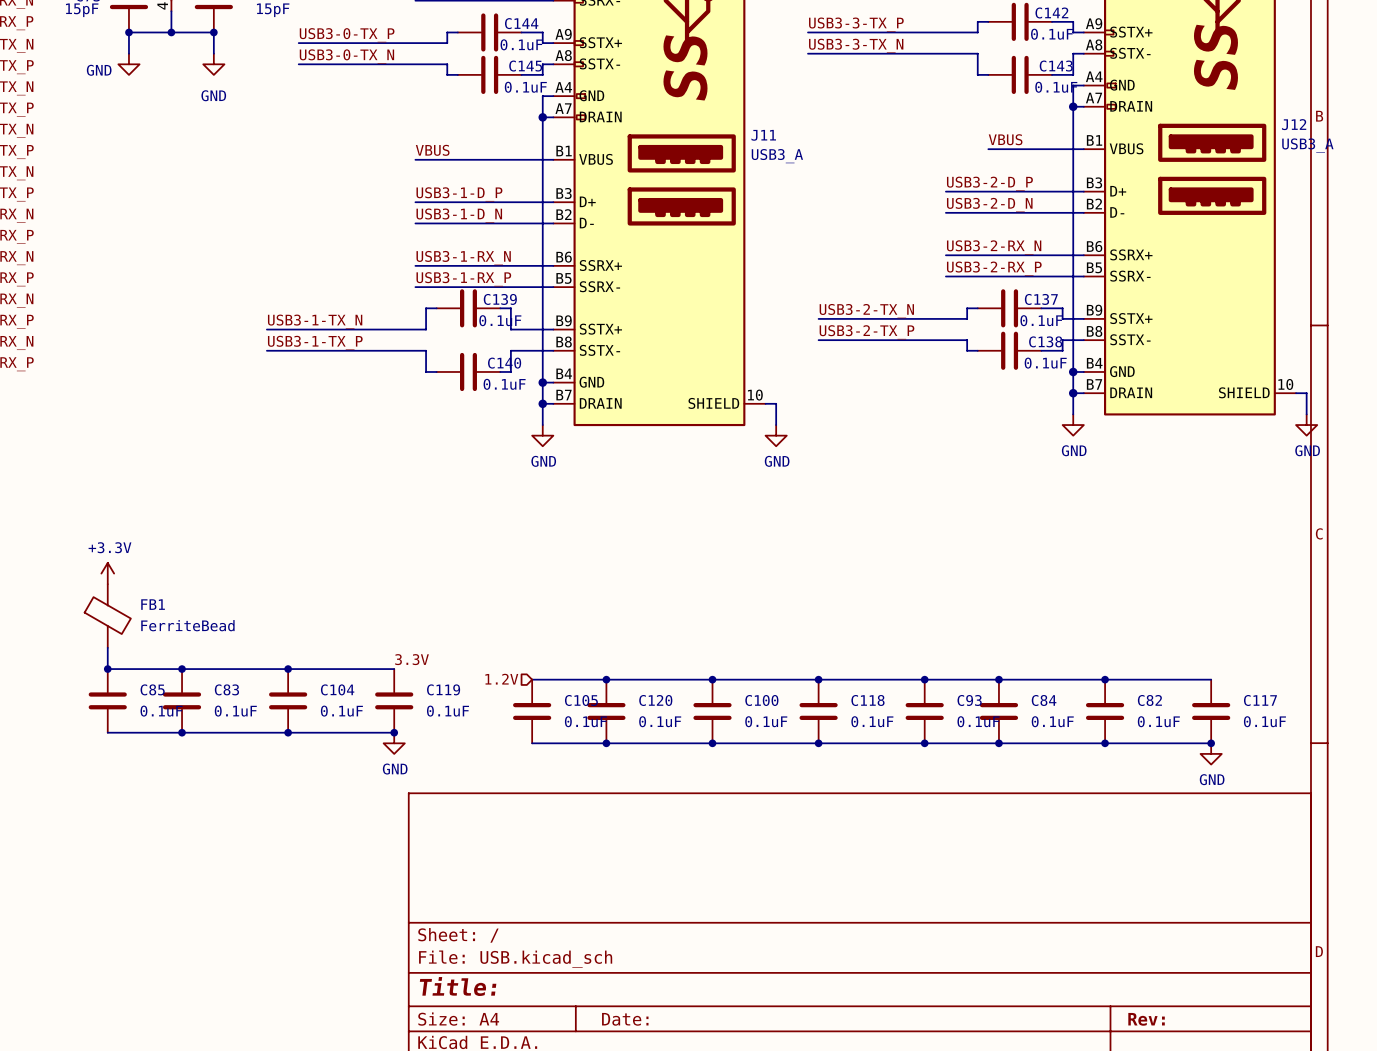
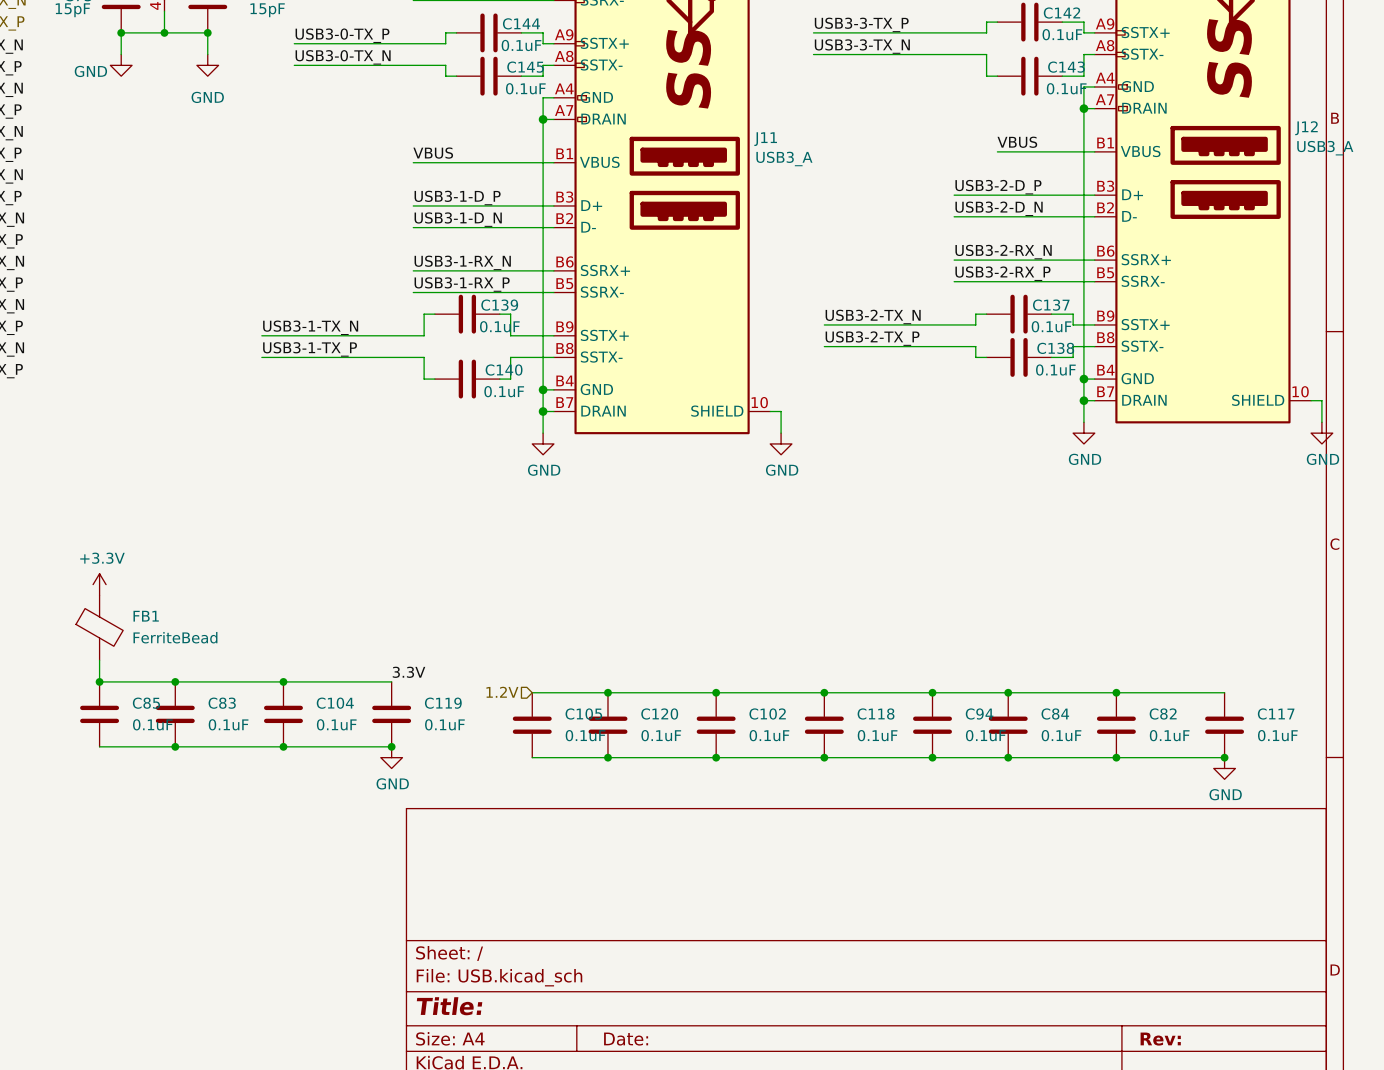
C100 name: C100 (761, 700) -> C102 (767, 714)
C93 name: C93 (969, 700) -> C94 (979, 714)

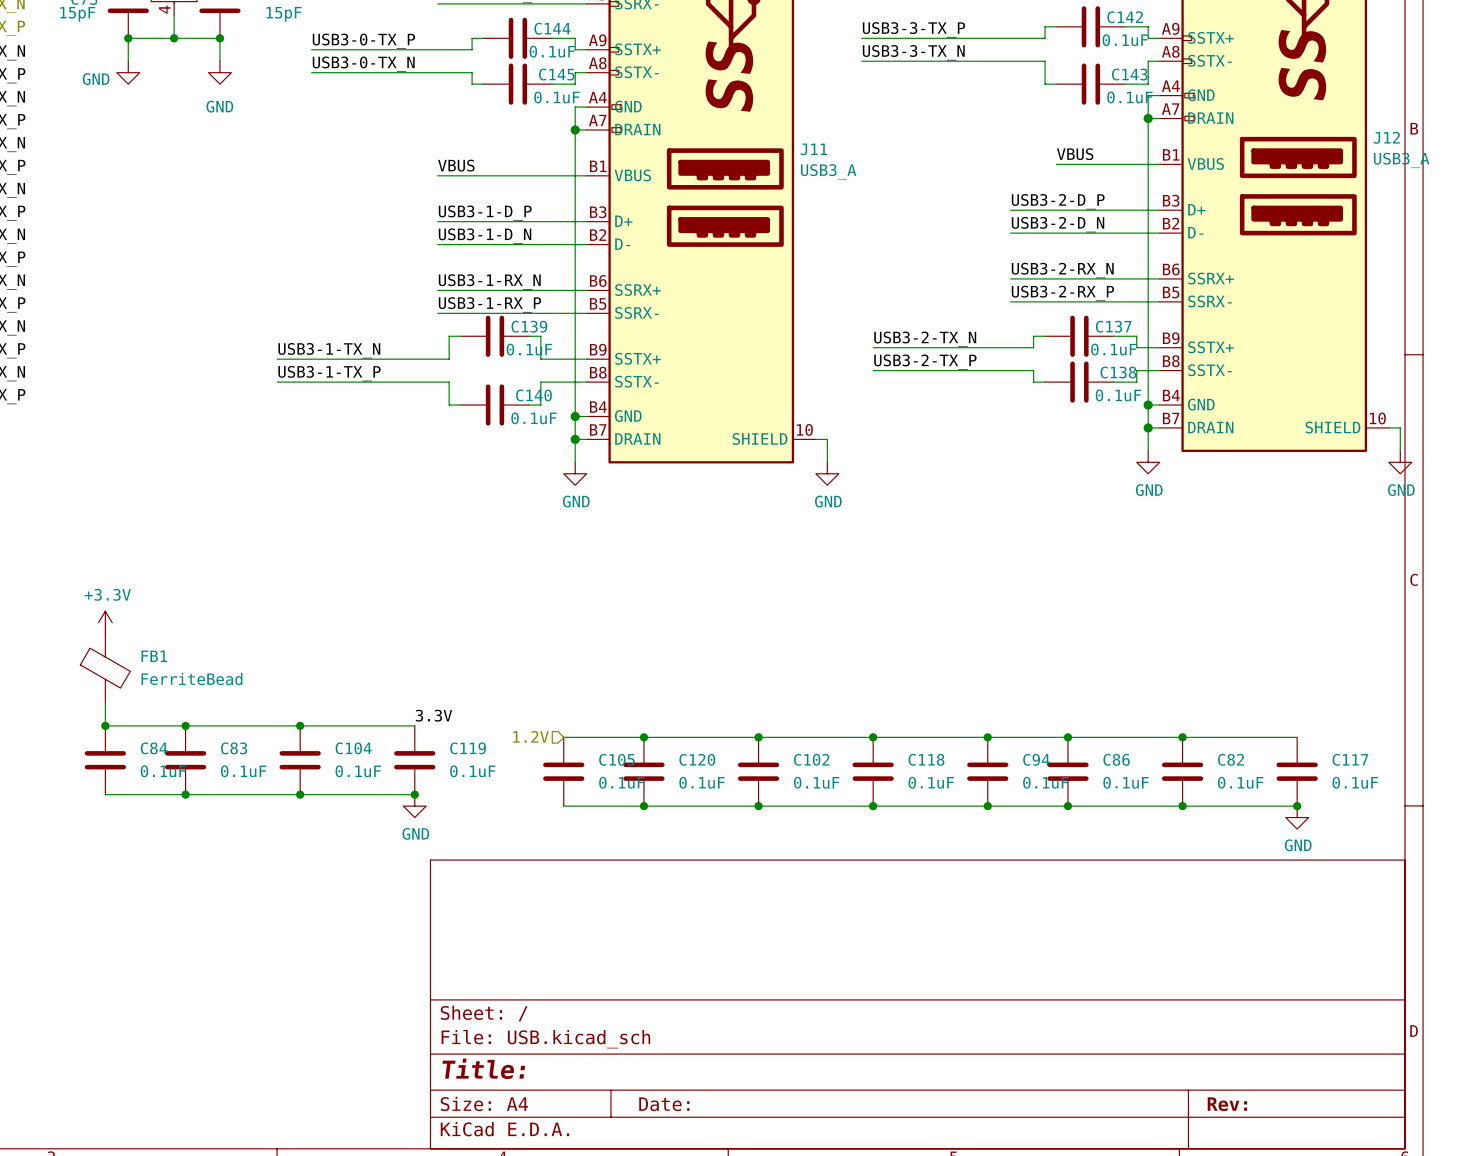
C85 name: C85 (146, 703) -> C84 (154, 748)
C84 name: C84 (1055, 714) -> C86 (1116, 759)

